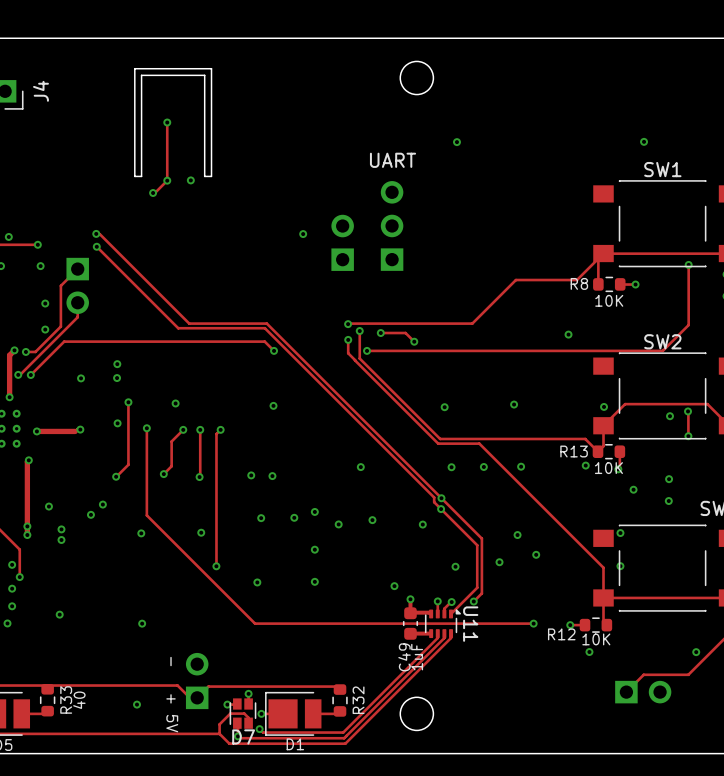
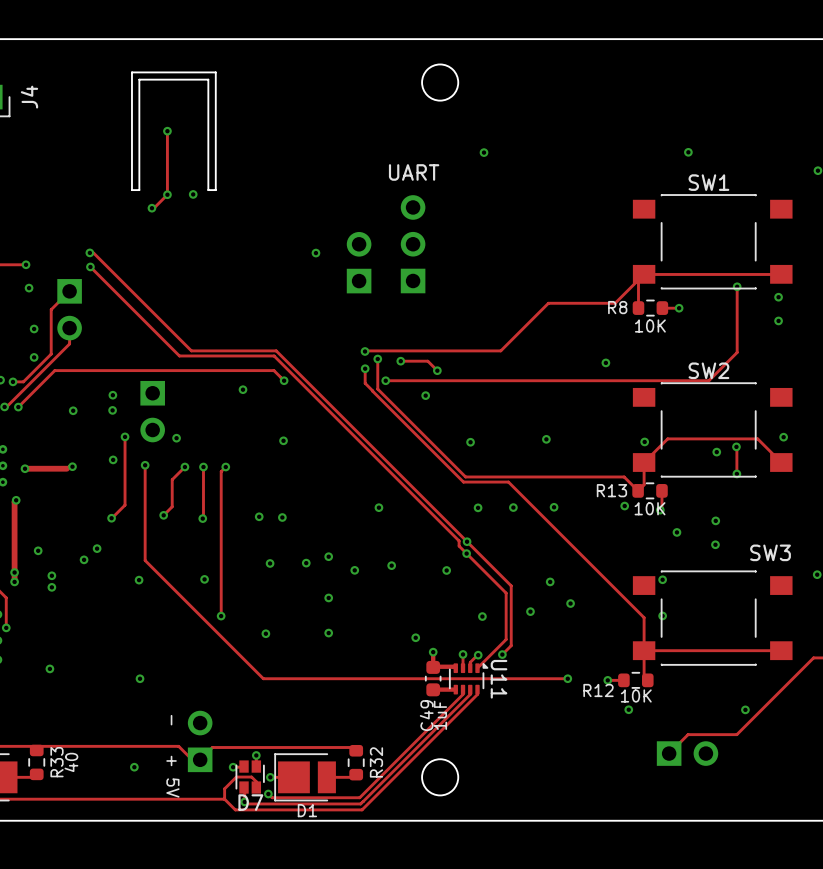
via: none -> (243, 389)
via: none -> (425, 395)
part: none -> (152, 411)

